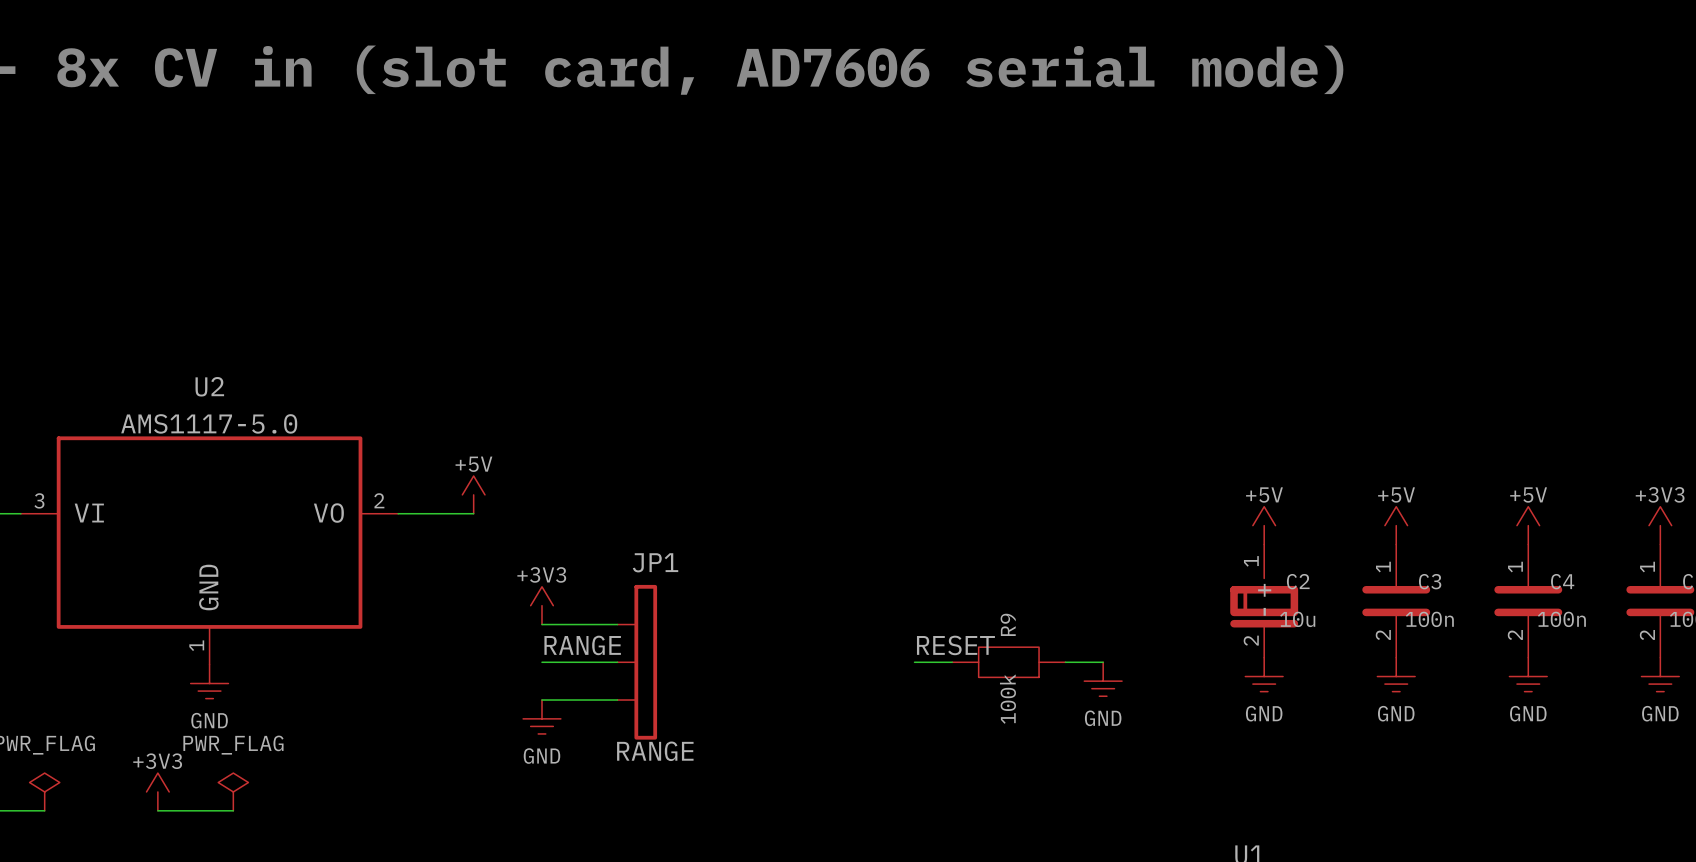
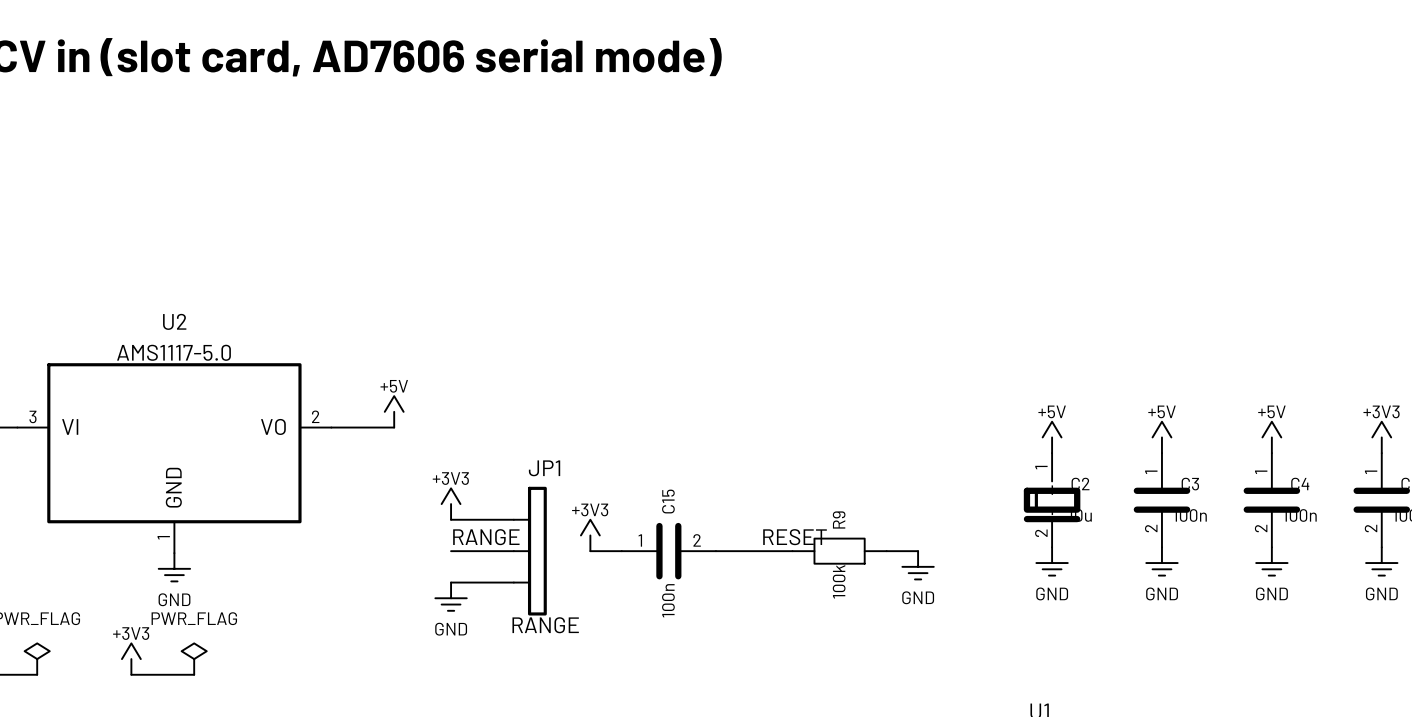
power symbol: none -> +3V3 (590, 535)
wire: none -> (590, 551) (621, 551)
C15: none -> 100n (668, 551)
wire: none -> (715, 551) (761, 551)

